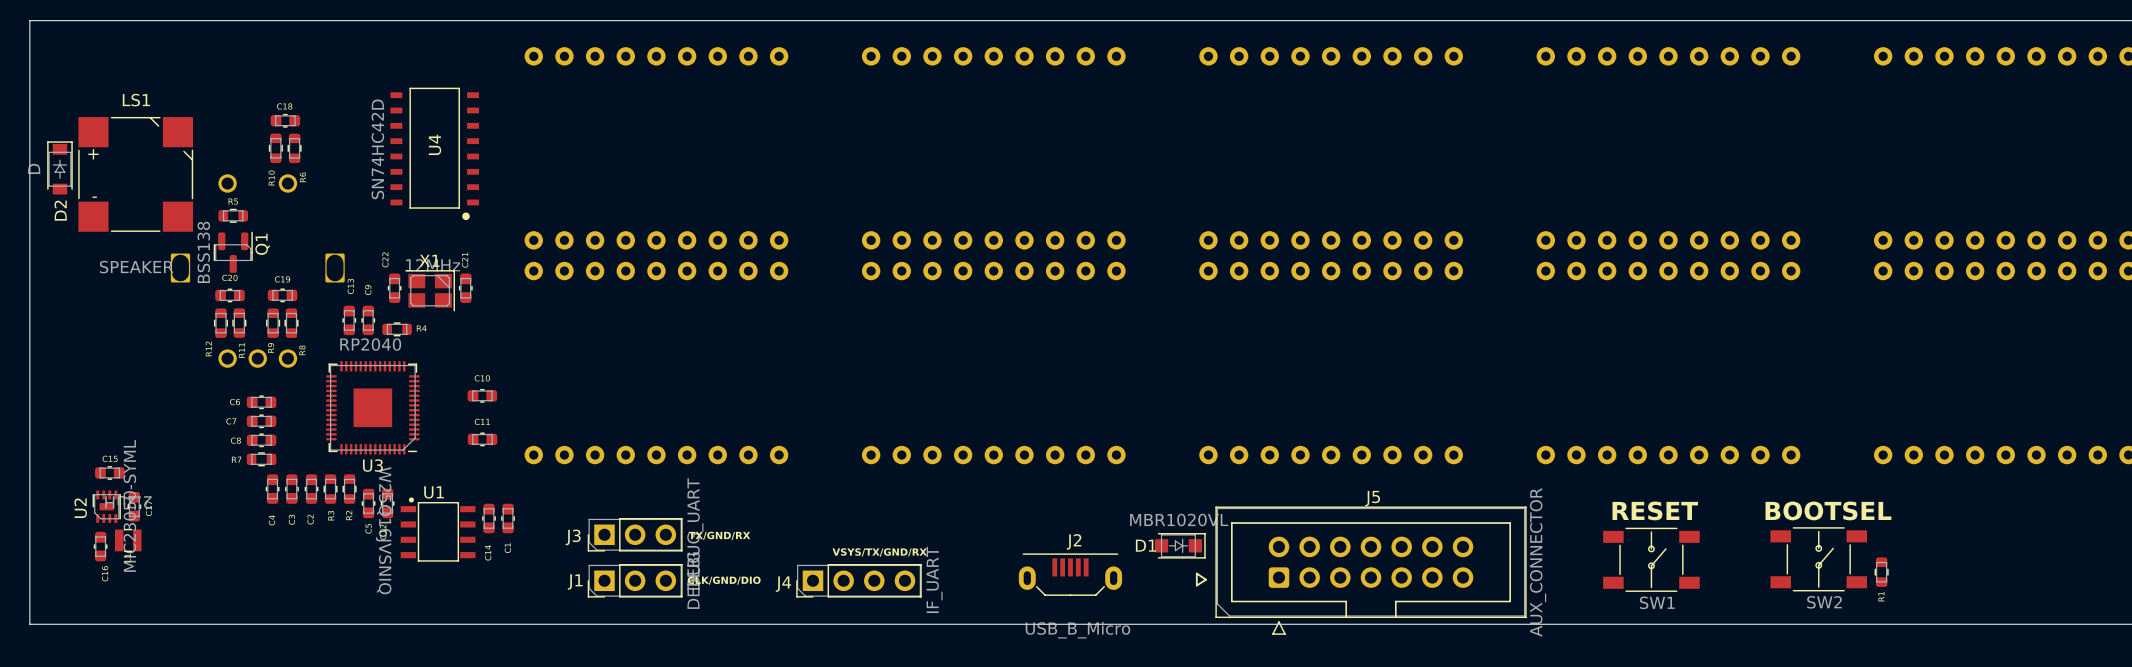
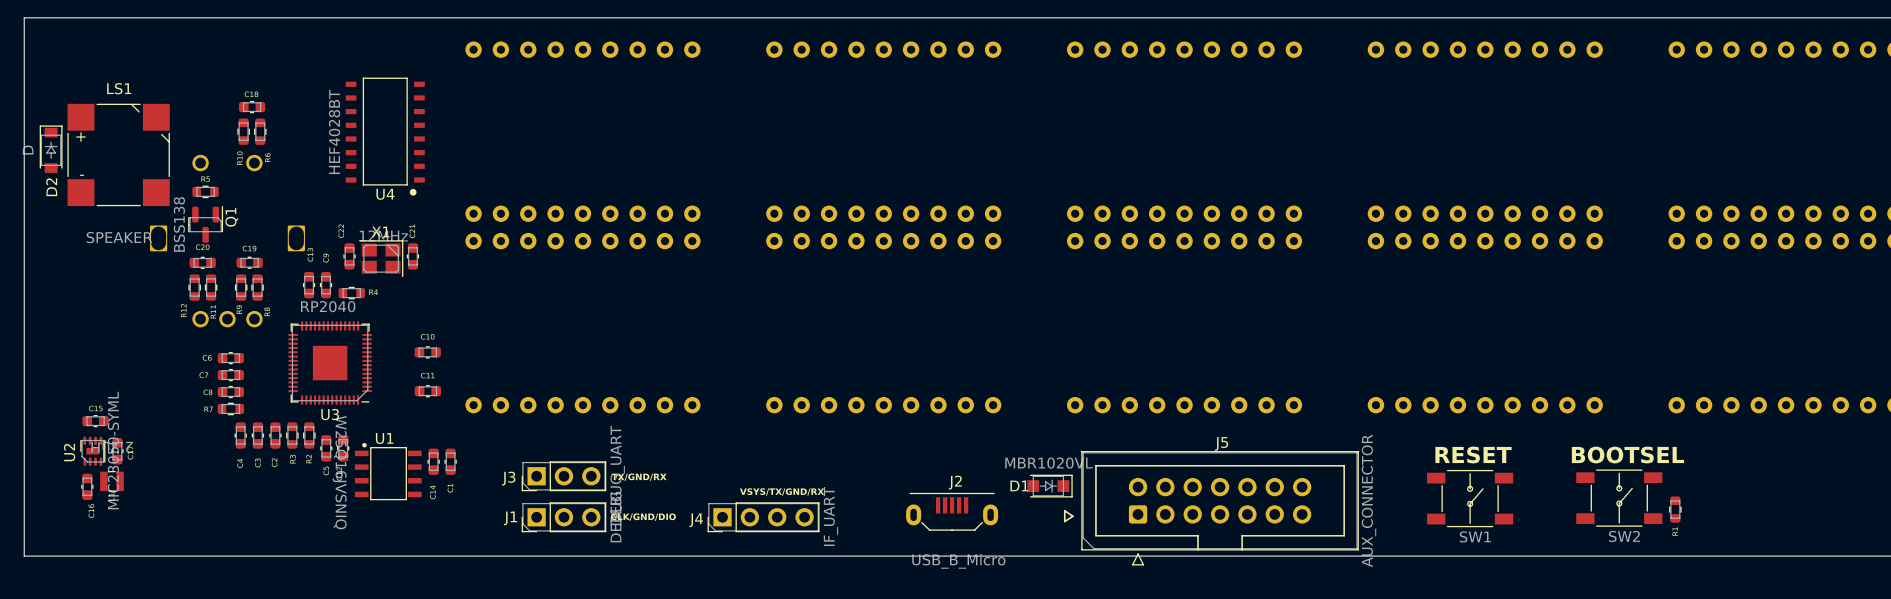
U4 name rotation: 0° (435, 144) -> 90° clockwise (385, 194)
U4 name position: U4 (435, 144) -> U4 (385, 194)
U4 value: SN74HC42D (377, 149) -> HEF4028BT (334, 131)

